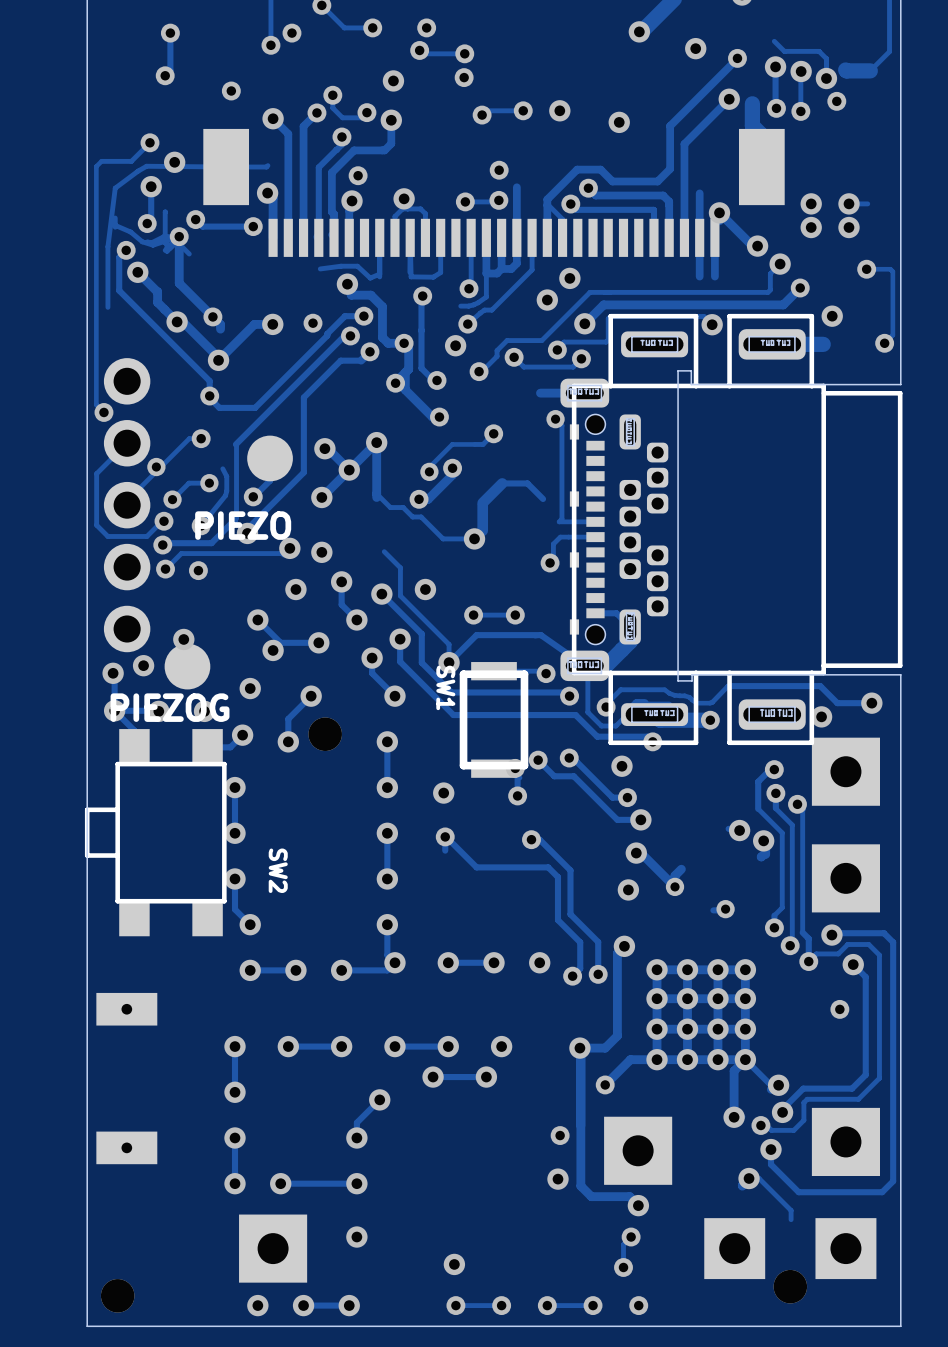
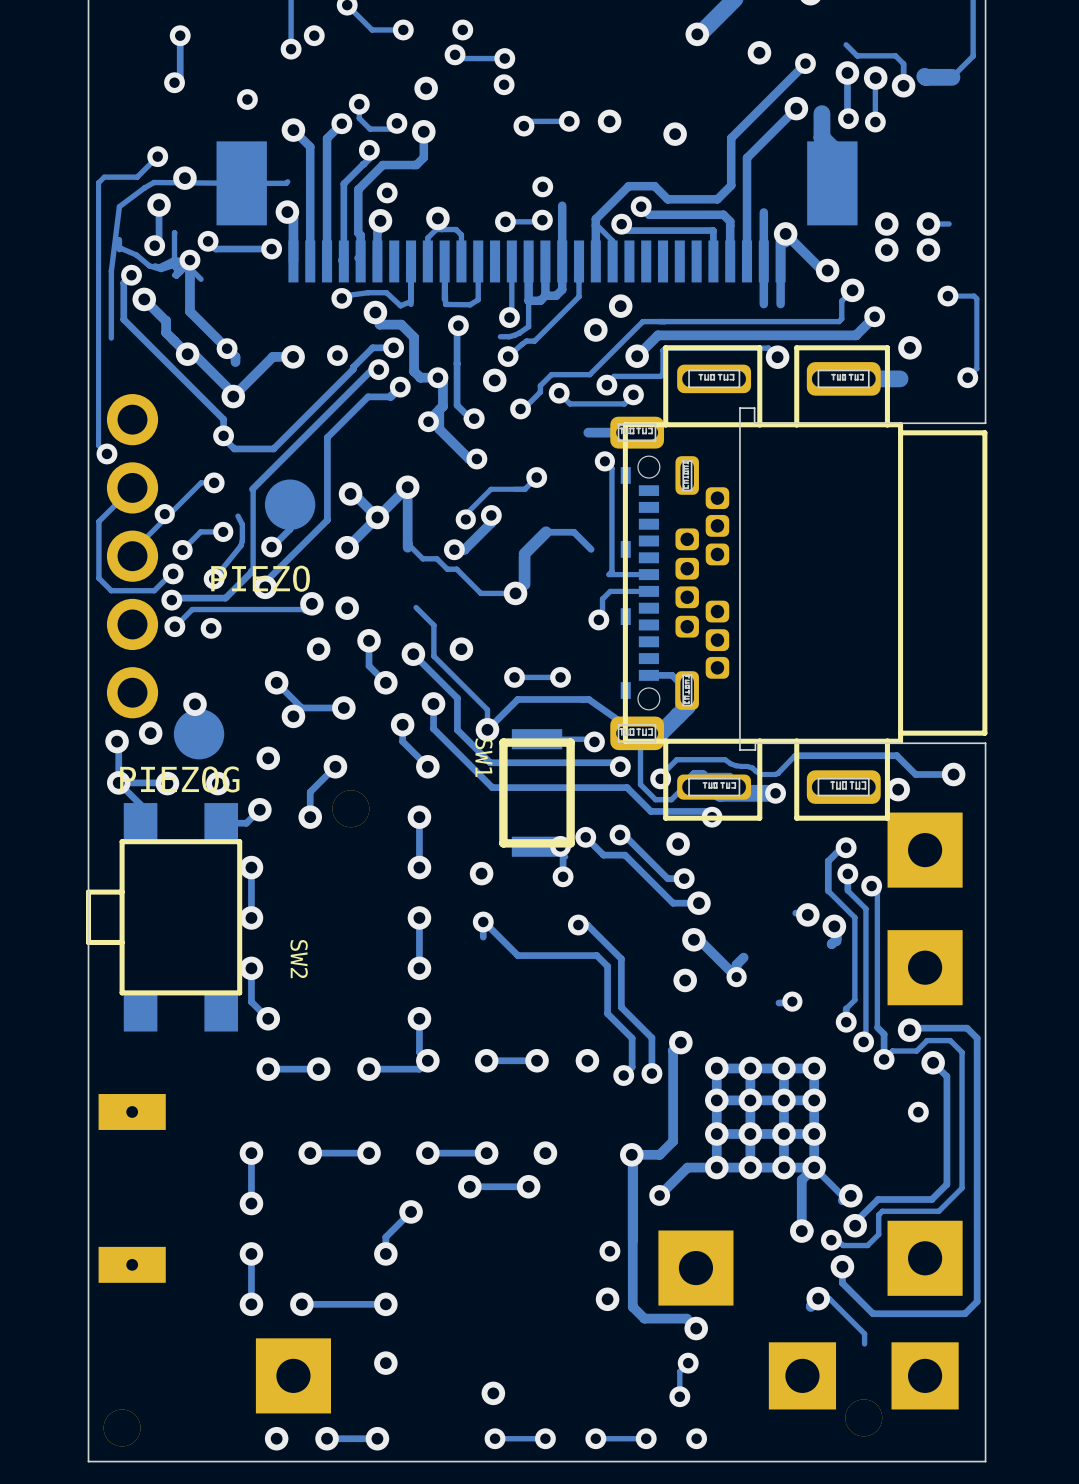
via: (836, 101) -> none
via: none -> (341, 298)

